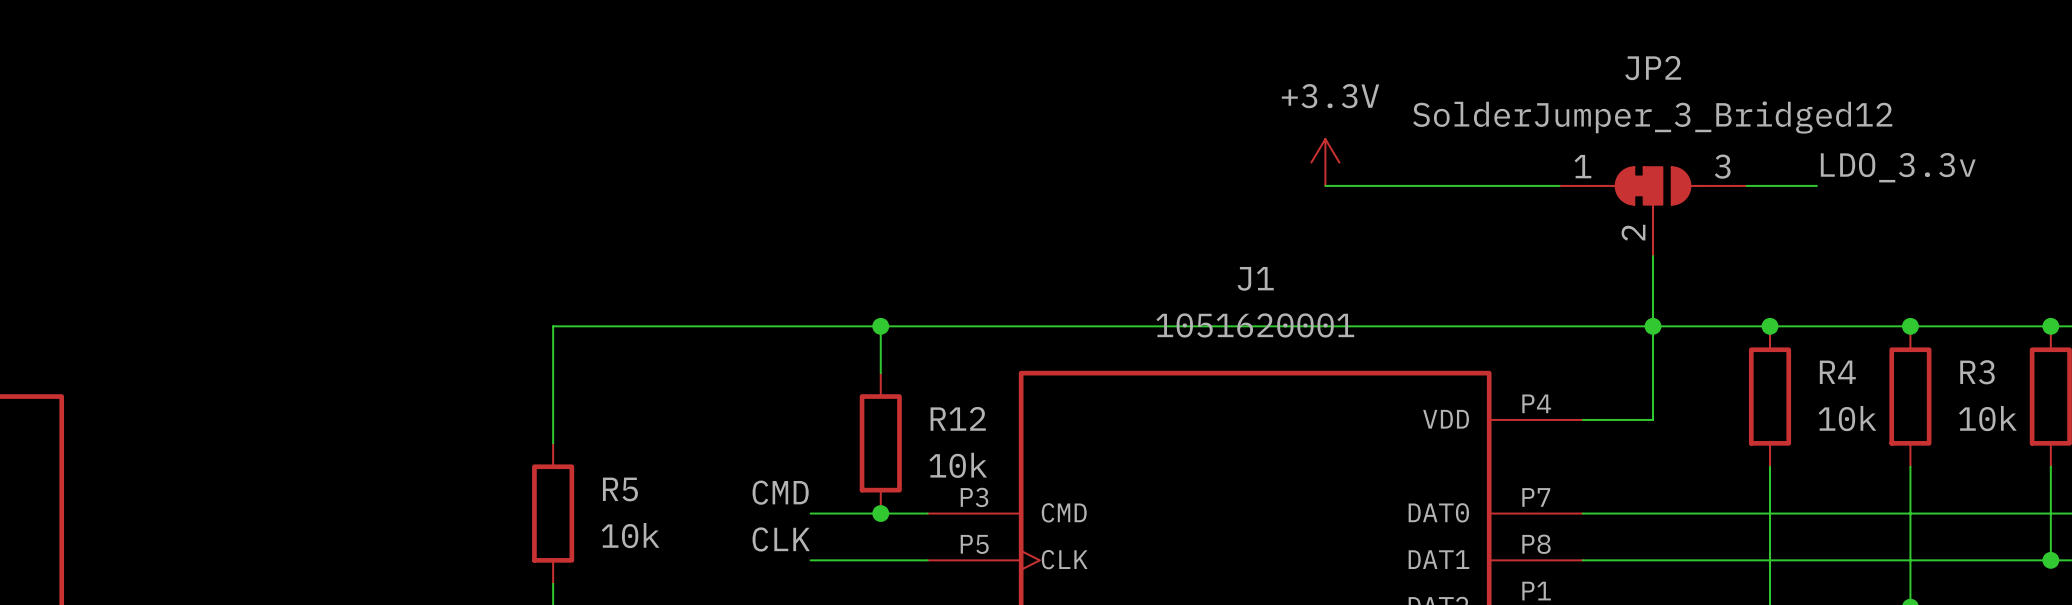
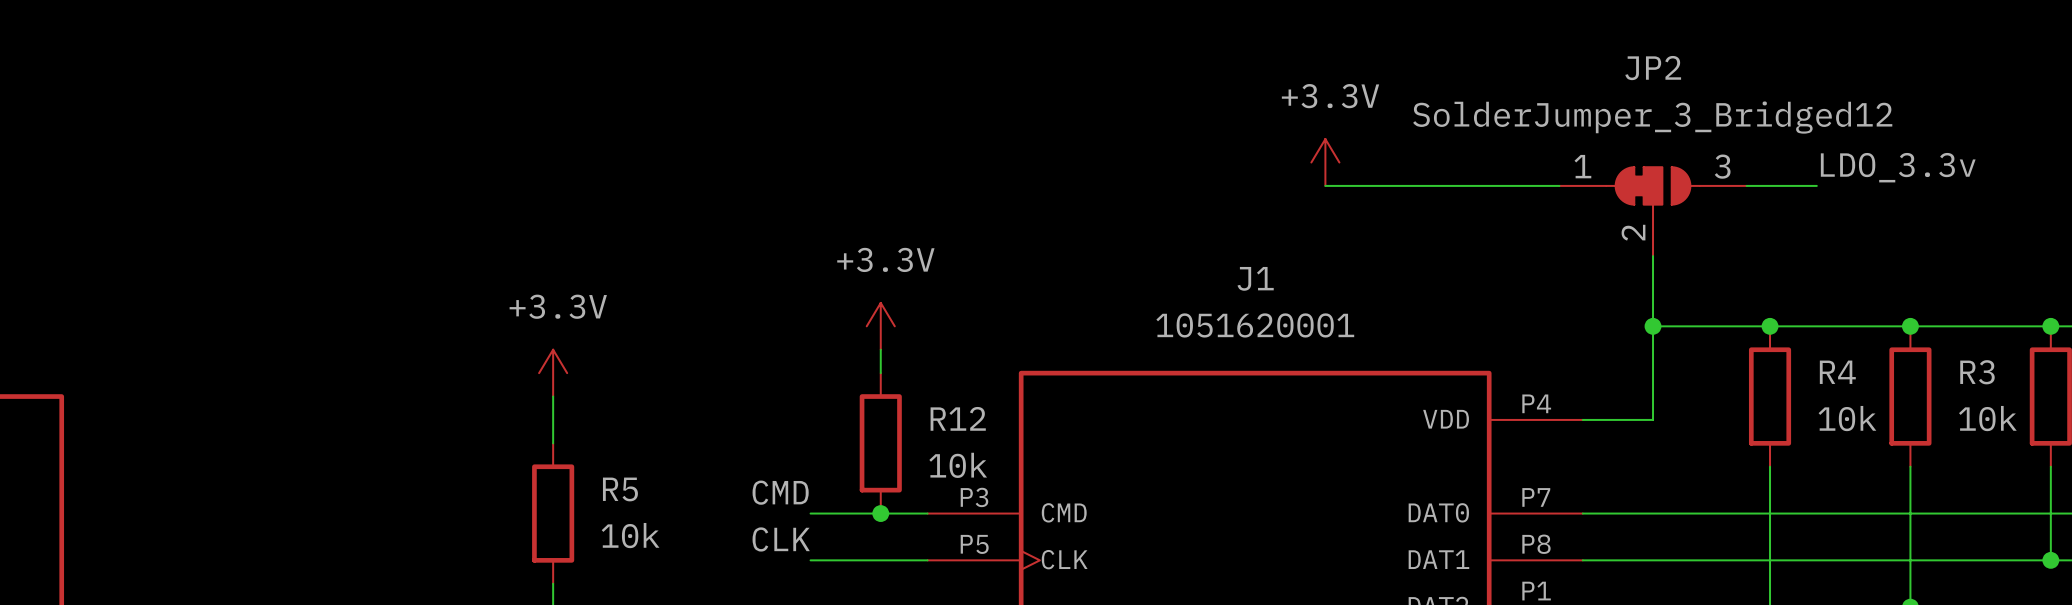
junction: (880, 326) -> none
power symbol: none -> +3.3V (880, 326)
wire: (1653, 326) (553, 326) (553, 396) -> none
power symbol: none -> +3.3V (553, 373)

